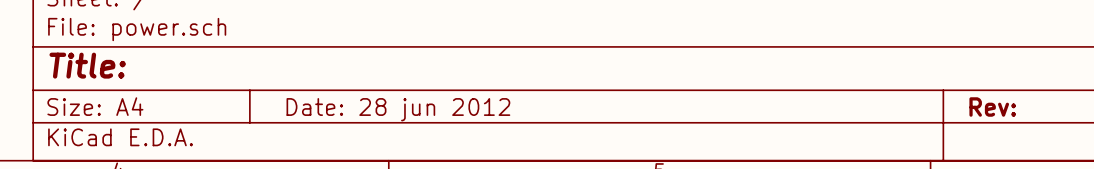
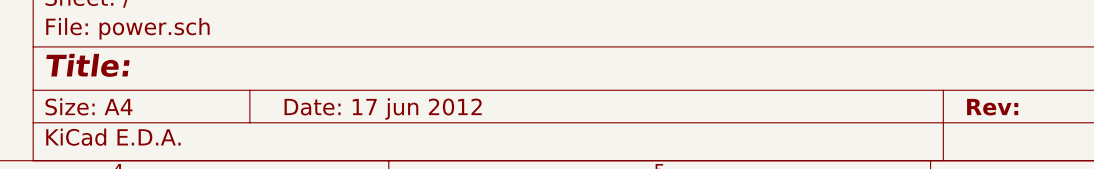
title block: Date: 28 jun 2012 (398, 109) -> Date: 17 jun 2012 (383, 108)

